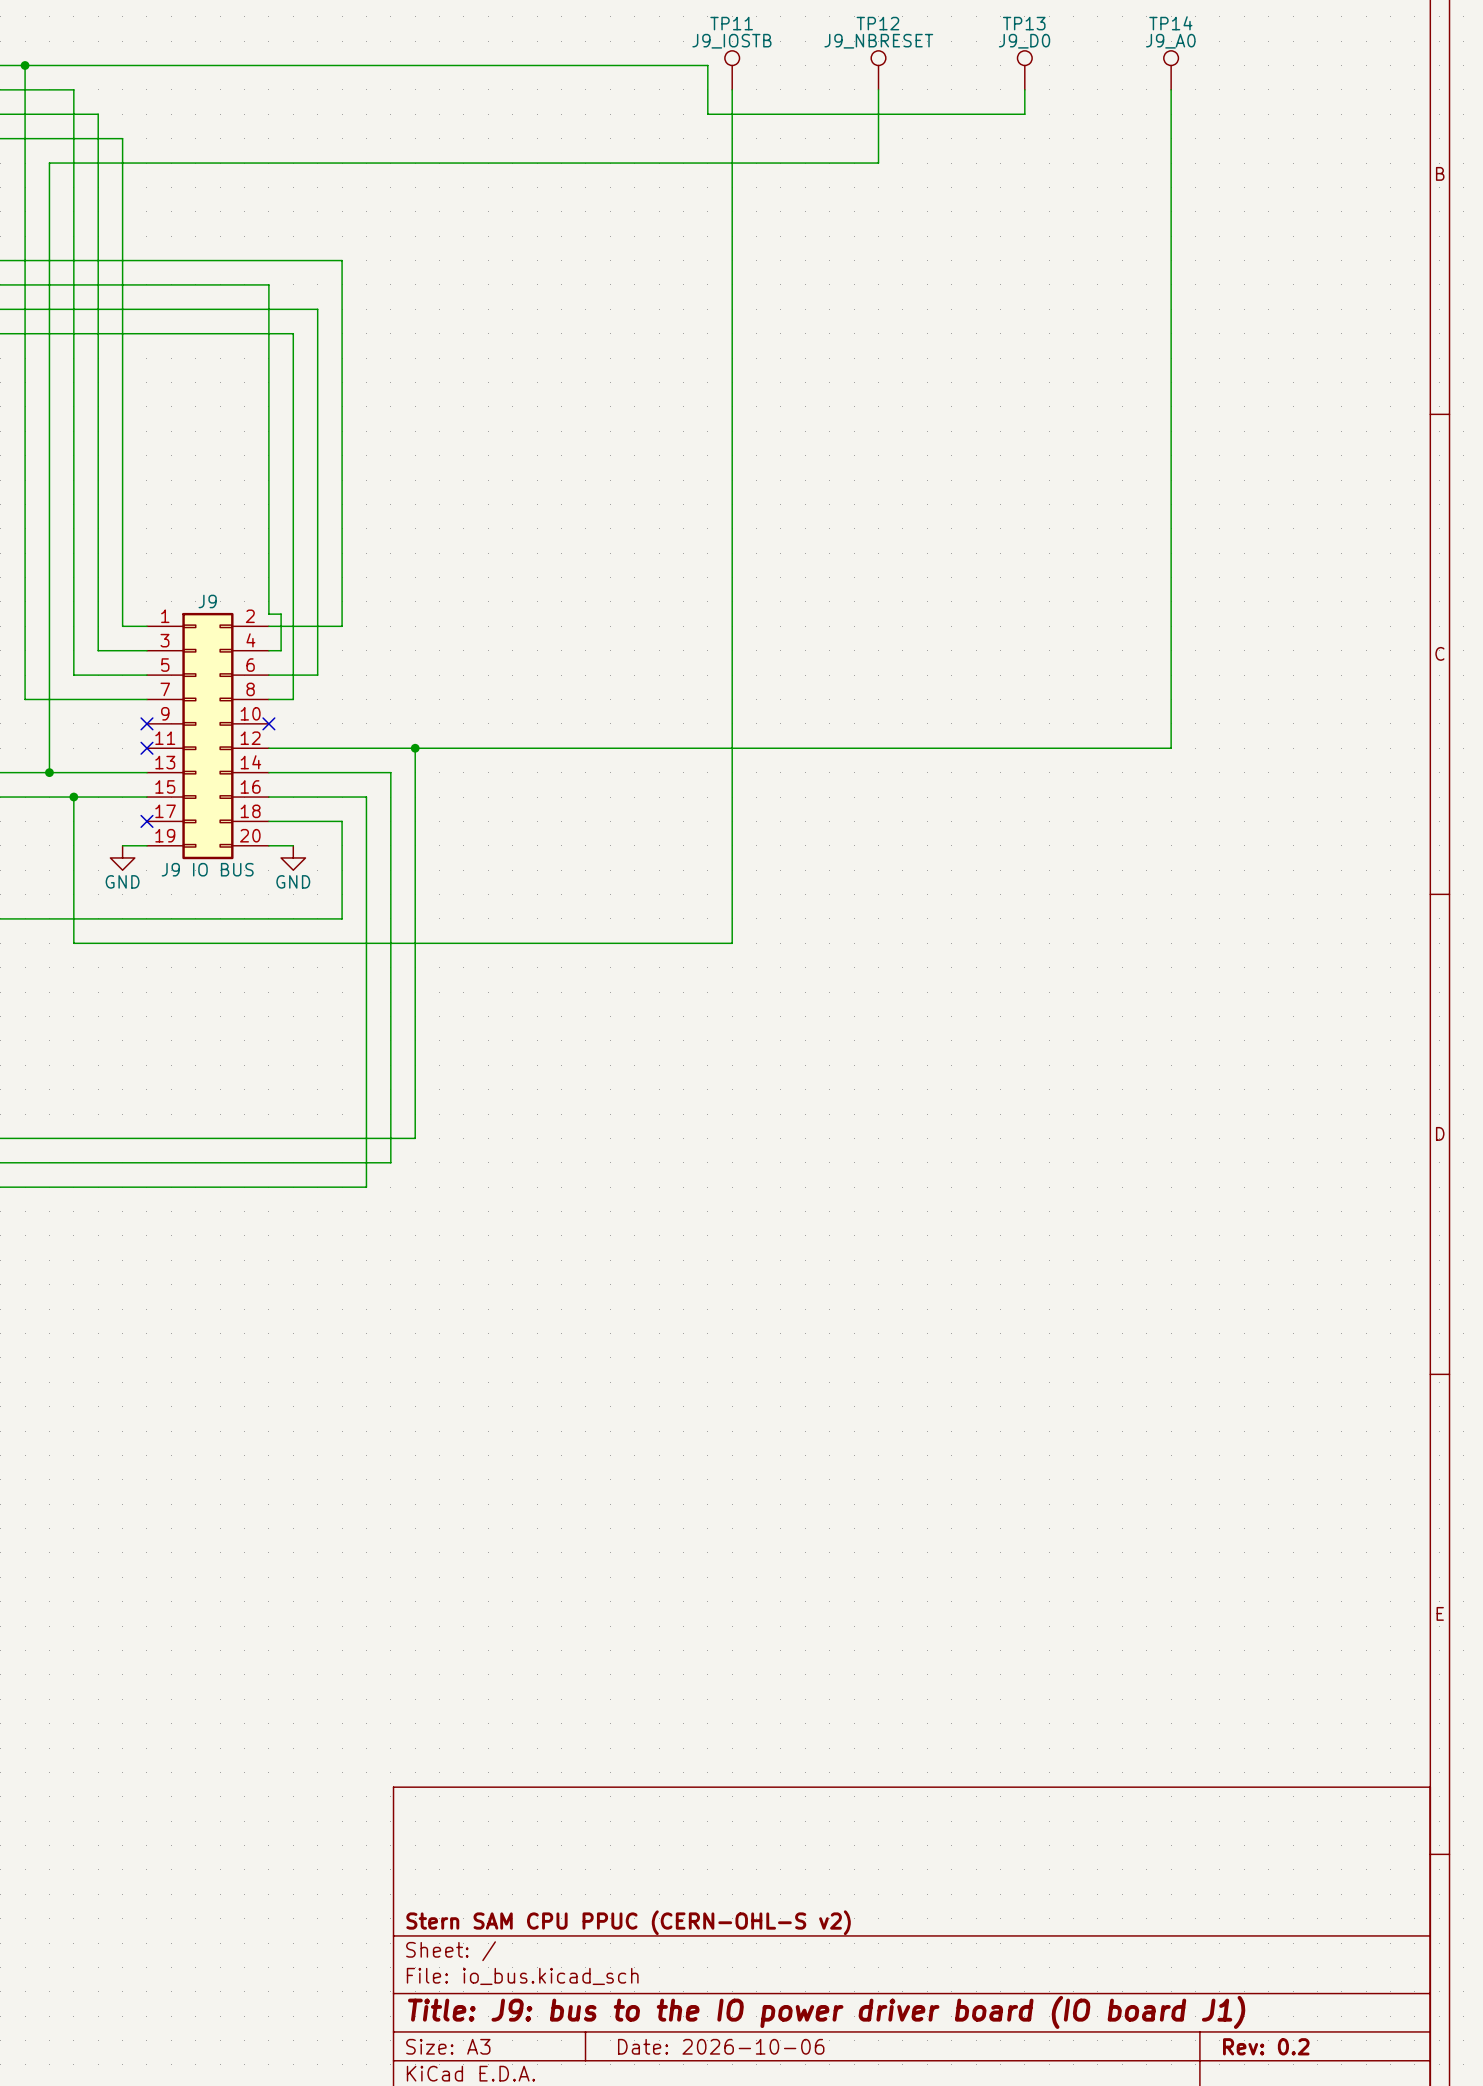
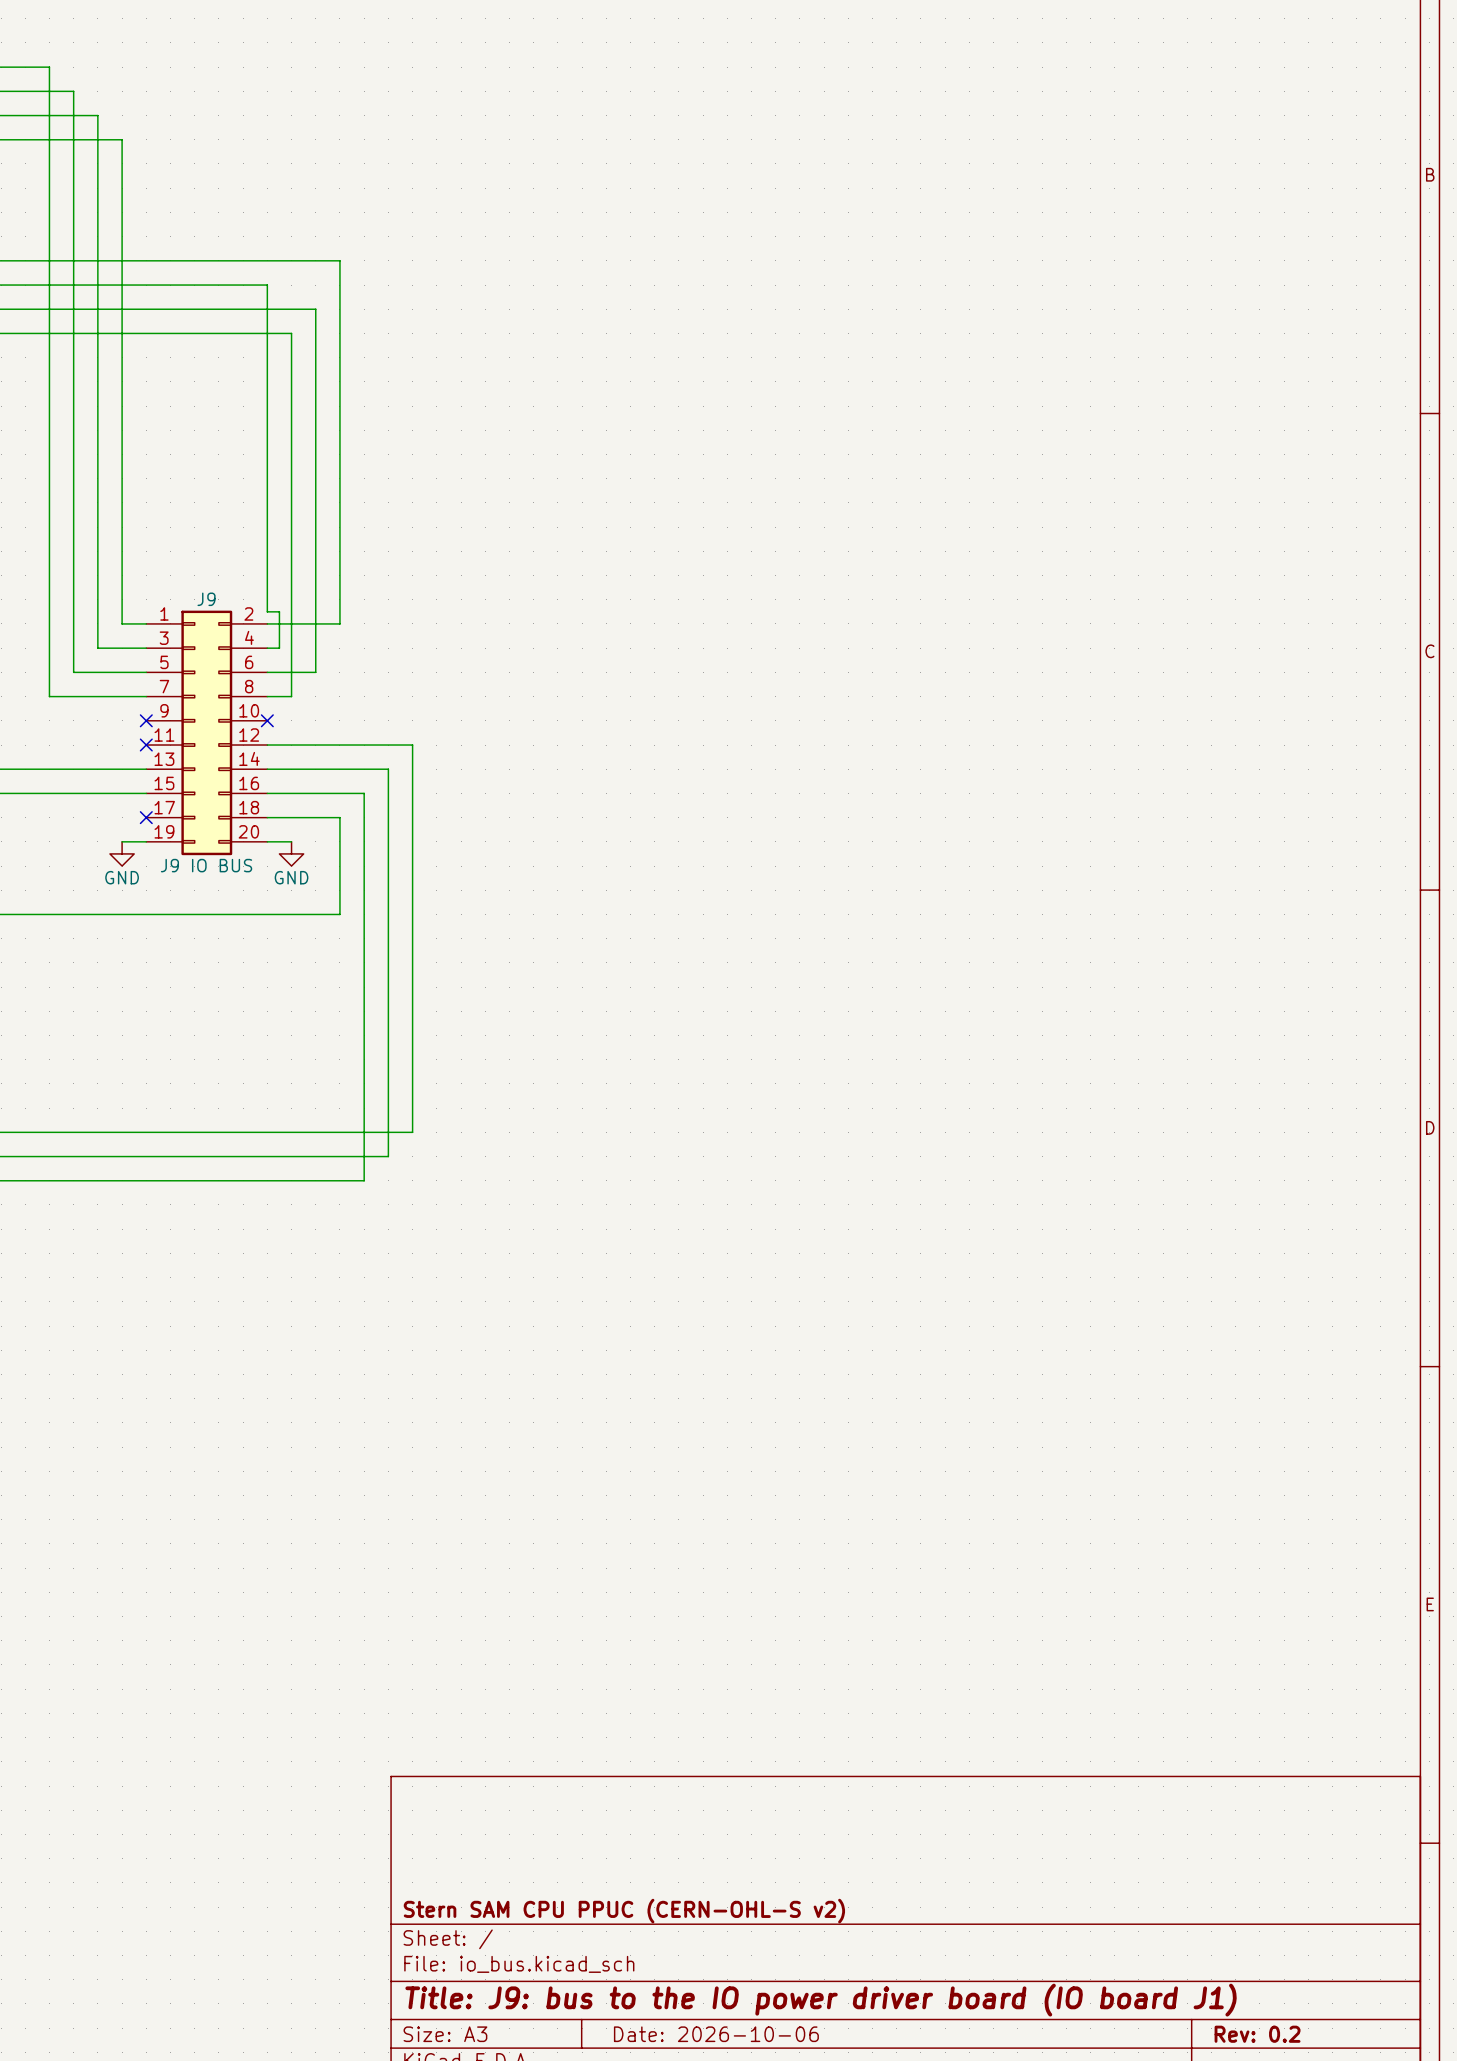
wire: (25, 65) (25, 699) (49, 699) (49, 772) -> none
junction: (25, 65) -> none
wire: (49, 65) (707, 65) (707, 114) (1024, 114) (1024, 89) -> none
TP11: J9_IOSTB (732, 70) -> none
TP12: J9_NBRESET (878, 70) -> none
TP13: J9_D0 (1024, 70) -> none
TP14: J9_A0 (1171, 70) -> none
wire: (732, 89) (732, 943) (73, 943) (73, 797) -> none
wire: (878, 89) (878, 163) (49, 163) -> (49, 67) (49, 163)
wire: (1171, 89) (1171, 748) (415, 748) -> none
junction: (415, 748) -> none
junction: (49, 772) -> none
junction: (73, 797) -> none

